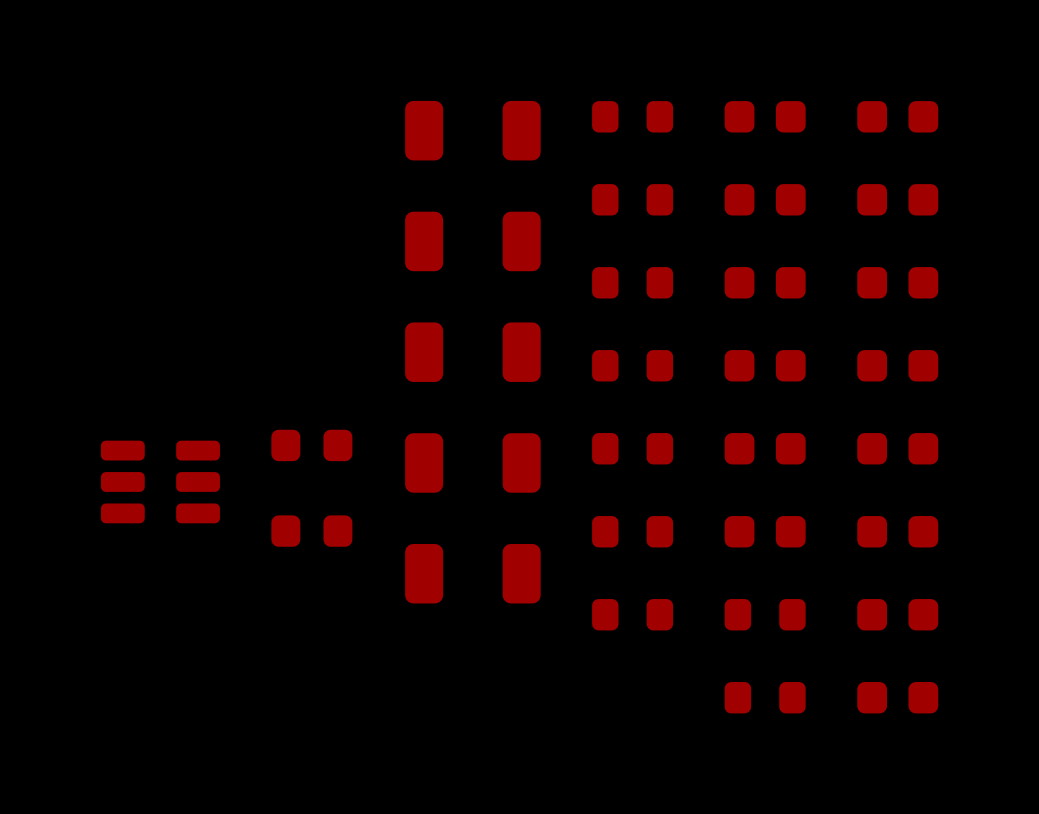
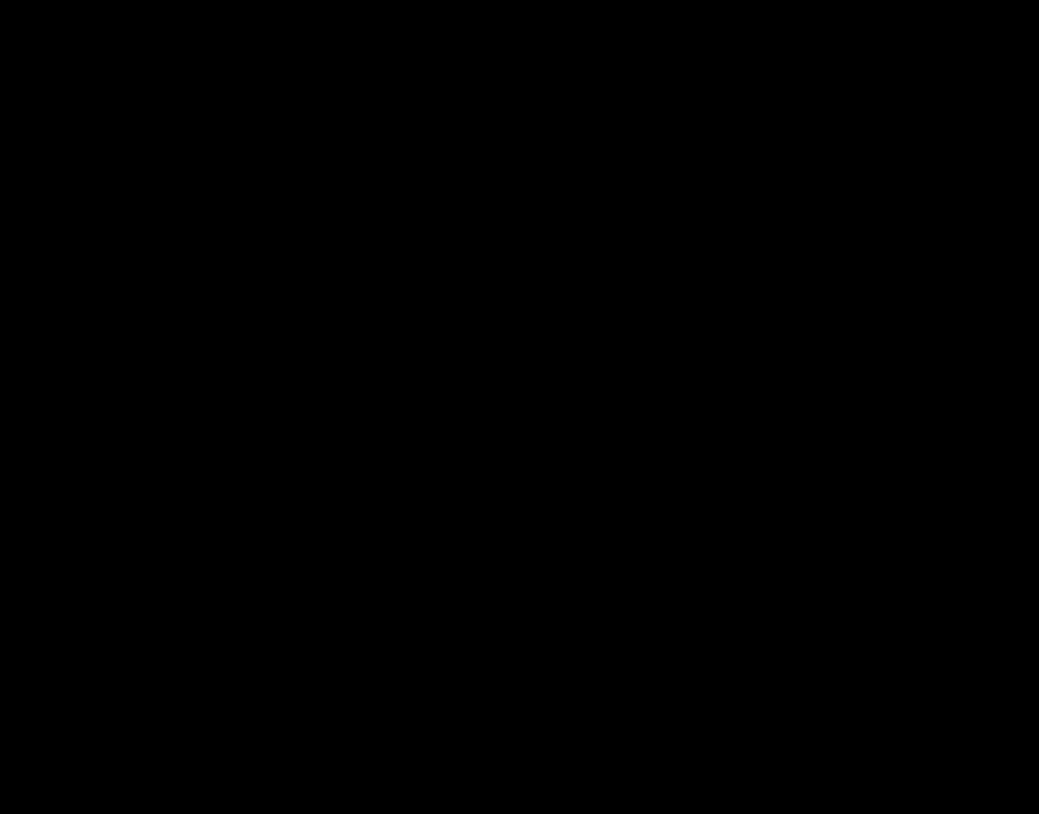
part: (632, 116) -> none
part: (765, 116) -> none
part: (897, 116) -> none
part: (472, 130) -> none
part: (632, 199) -> none
part: (765, 199) -> none
part: (897, 199) -> none
part: (472, 241) -> none
part: (632, 282) -> none
part: (765, 282) -> none
part: (897, 282) -> none
part: (472, 352) -> none
part: (632, 365) -> none
part: (765, 365) -> none
part: (897, 365) -> none
part: (311, 445) -> none
part: (632, 448) -> none
part: (765, 448) -> none
part: (897, 448) -> none
part: (472, 462) -> none
part: (160, 481) -> none
part: (311, 531) -> none
part: (632, 531) -> none
part: (765, 531) -> none
part: (897, 531) -> none
part: (472, 573) -> none
part: (632, 614) -> none
part: (765, 614) -> none
part: (897, 614) -> none
part: (765, 697) -> none
part: (897, 697) -> none

